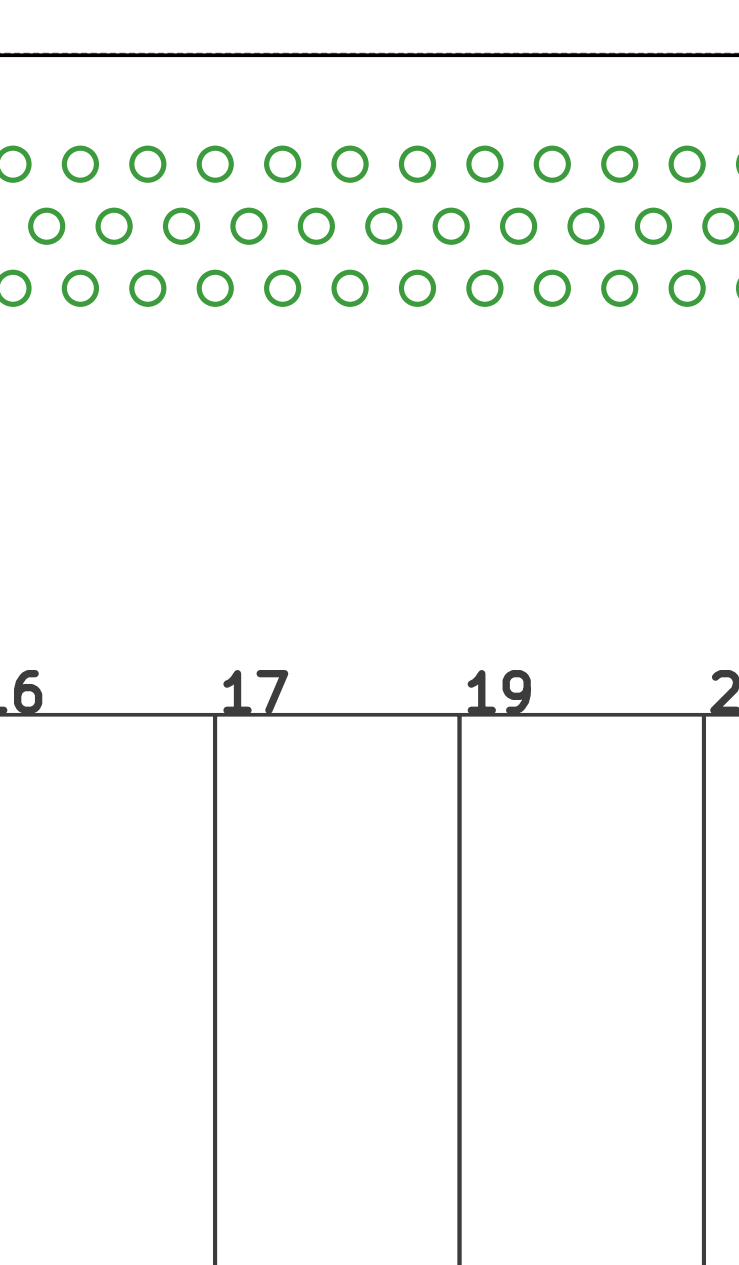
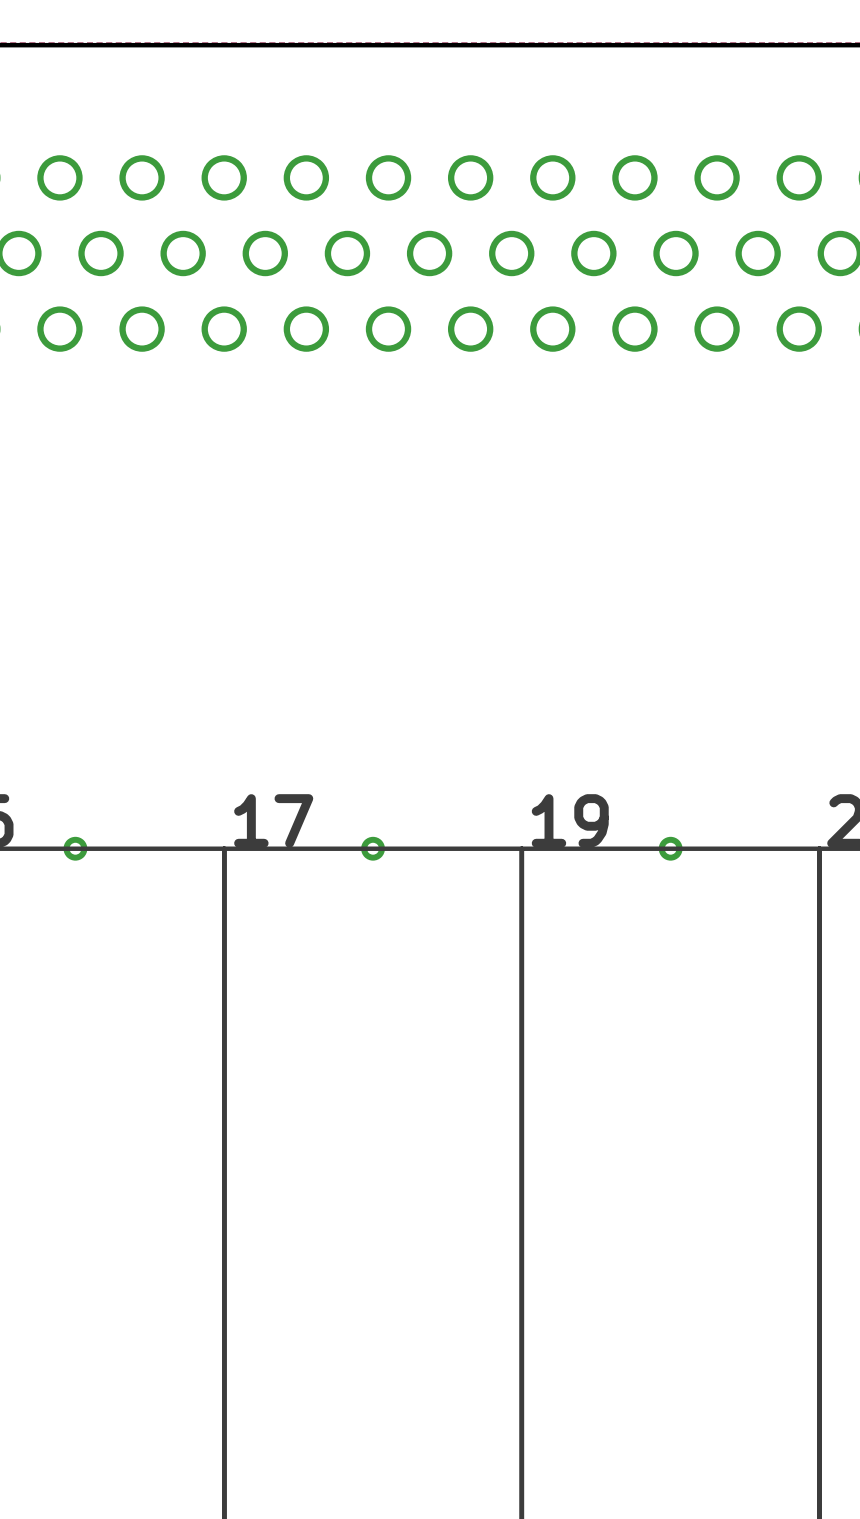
via: none -> (75, 848)
via: none -> (373, 848)
via: none -> (670, 848)

